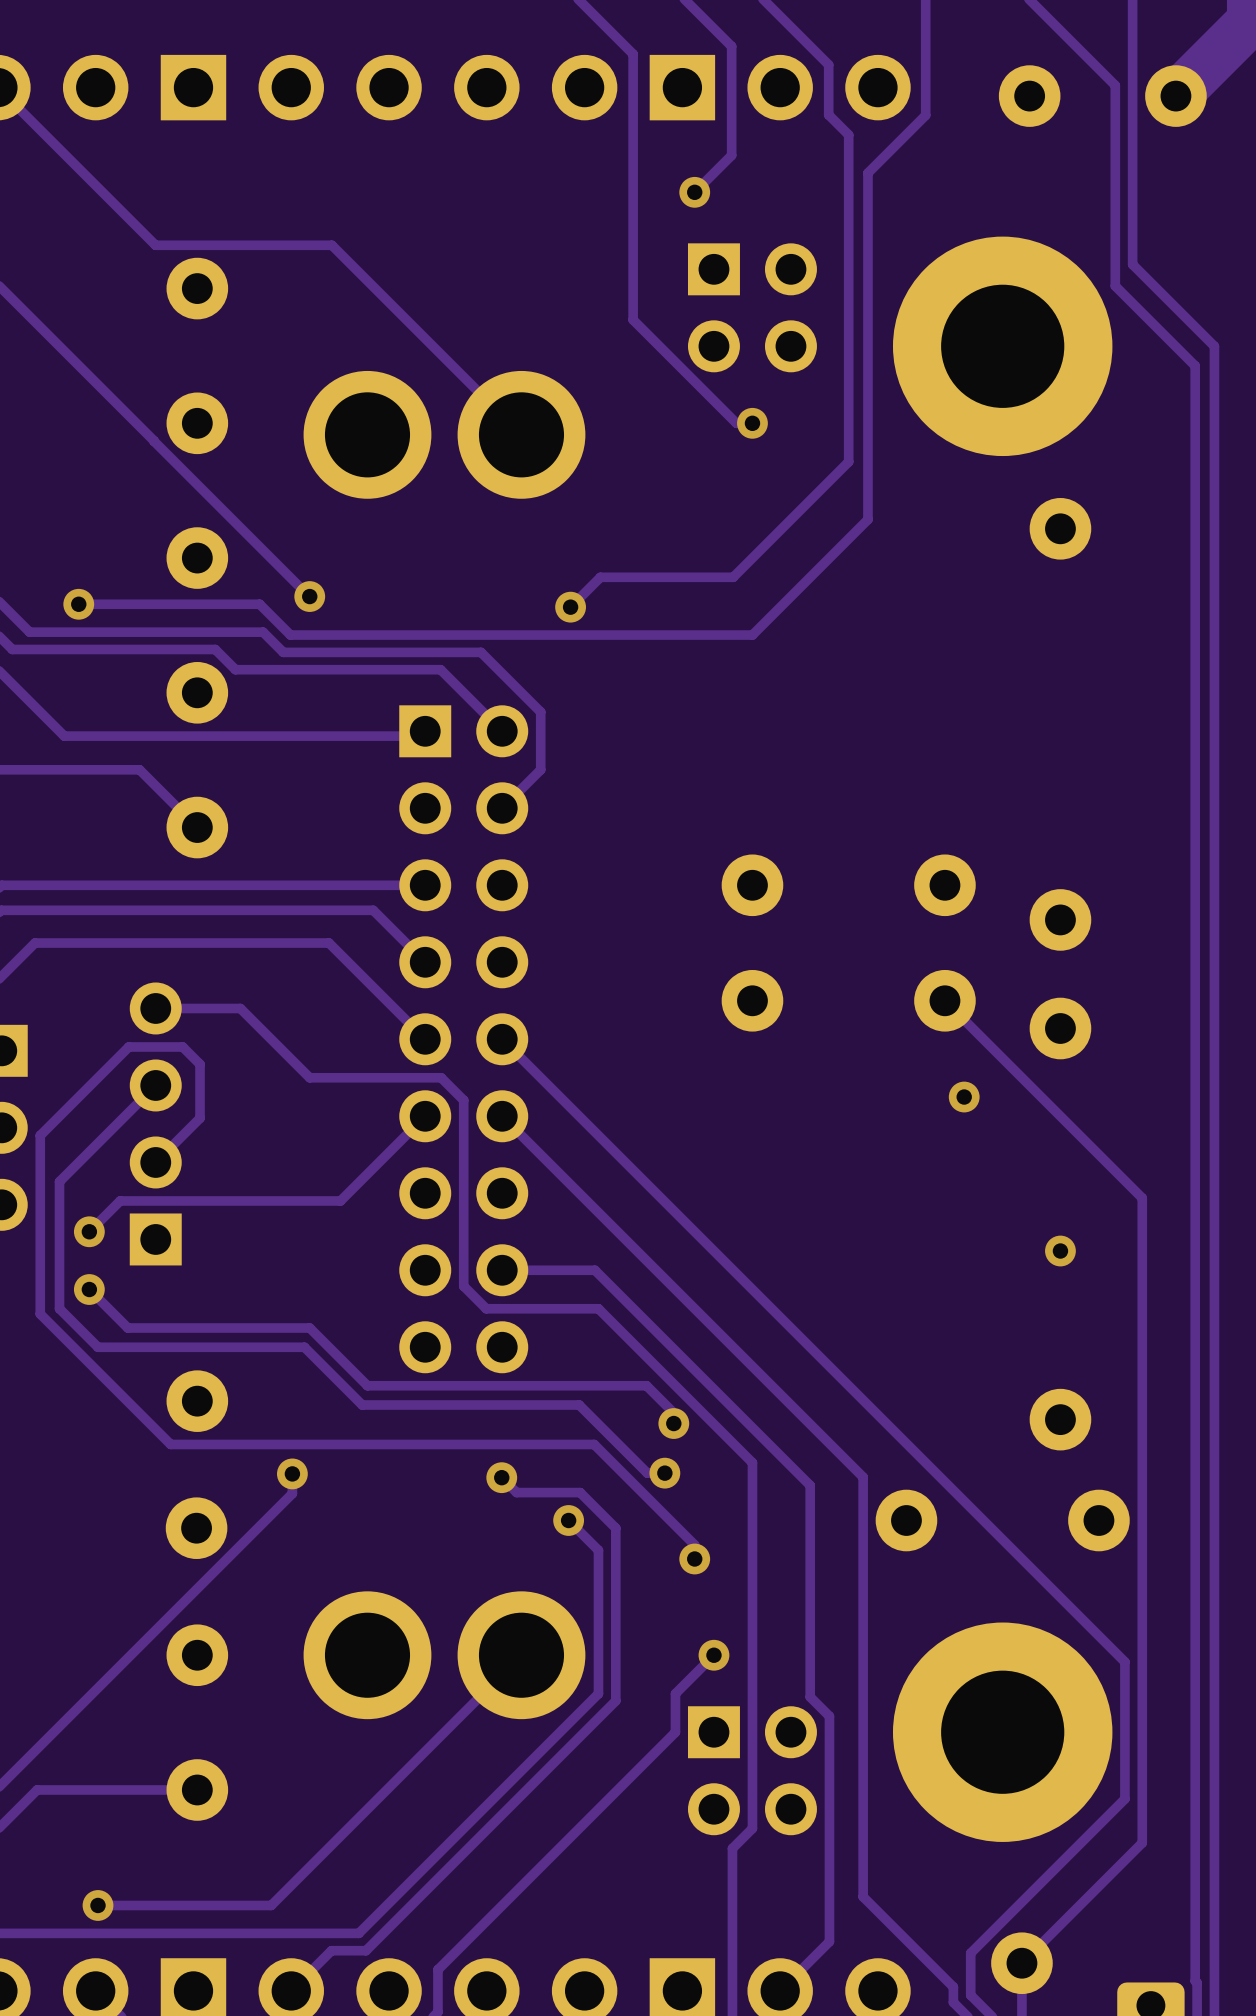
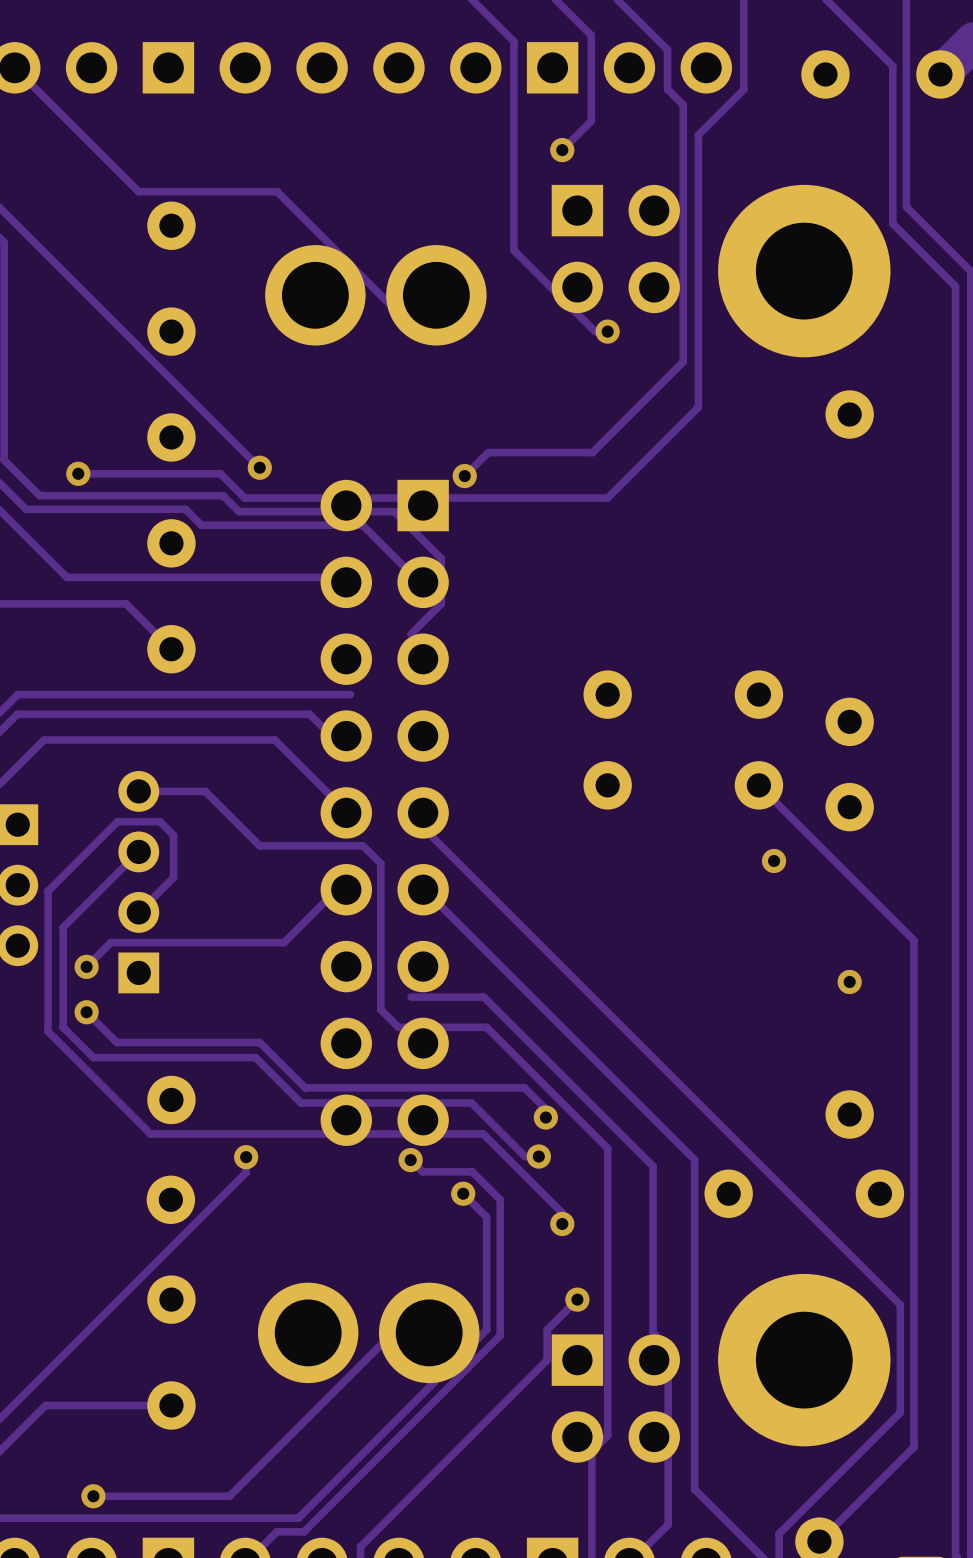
part footprint: [687, 243, 817, 373] -> [551, 184, 680, 314]
part position: (444, 434) -> (375, 295)
part footprint: [399, 705, 529, 1374] -> [320, 479, 449, 1146]
part position: (444, 1655) -> (368, 1332)
part footprint: [687, 1706, 817, 1836] -> [551, 1334, 680, 1463]

